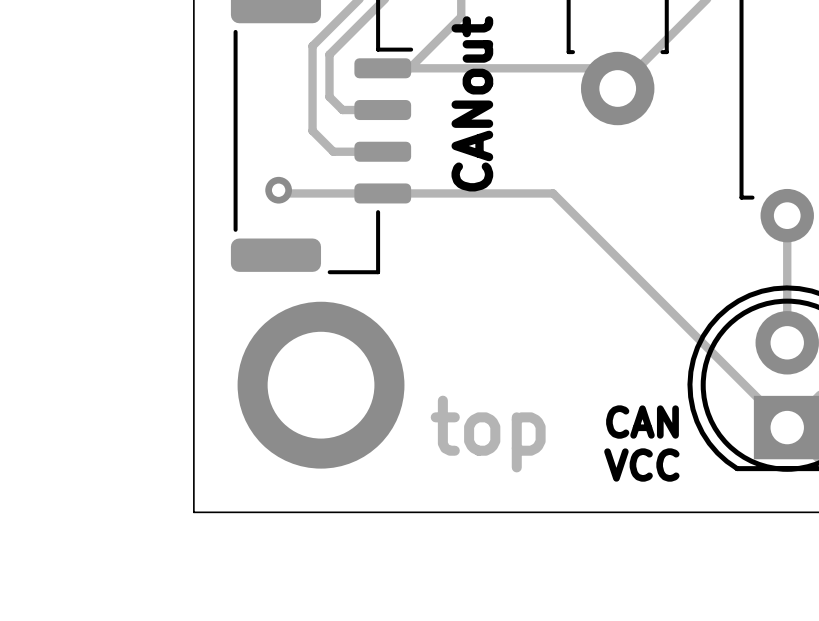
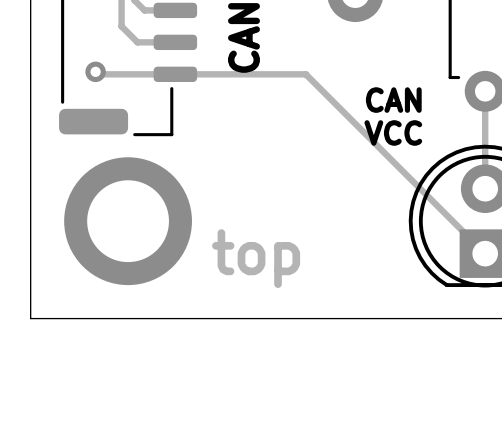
text position: CAN (642, 422) -> CAN (393, 100)
text position: VCC (641, 465) -> VCC (393, 132)

